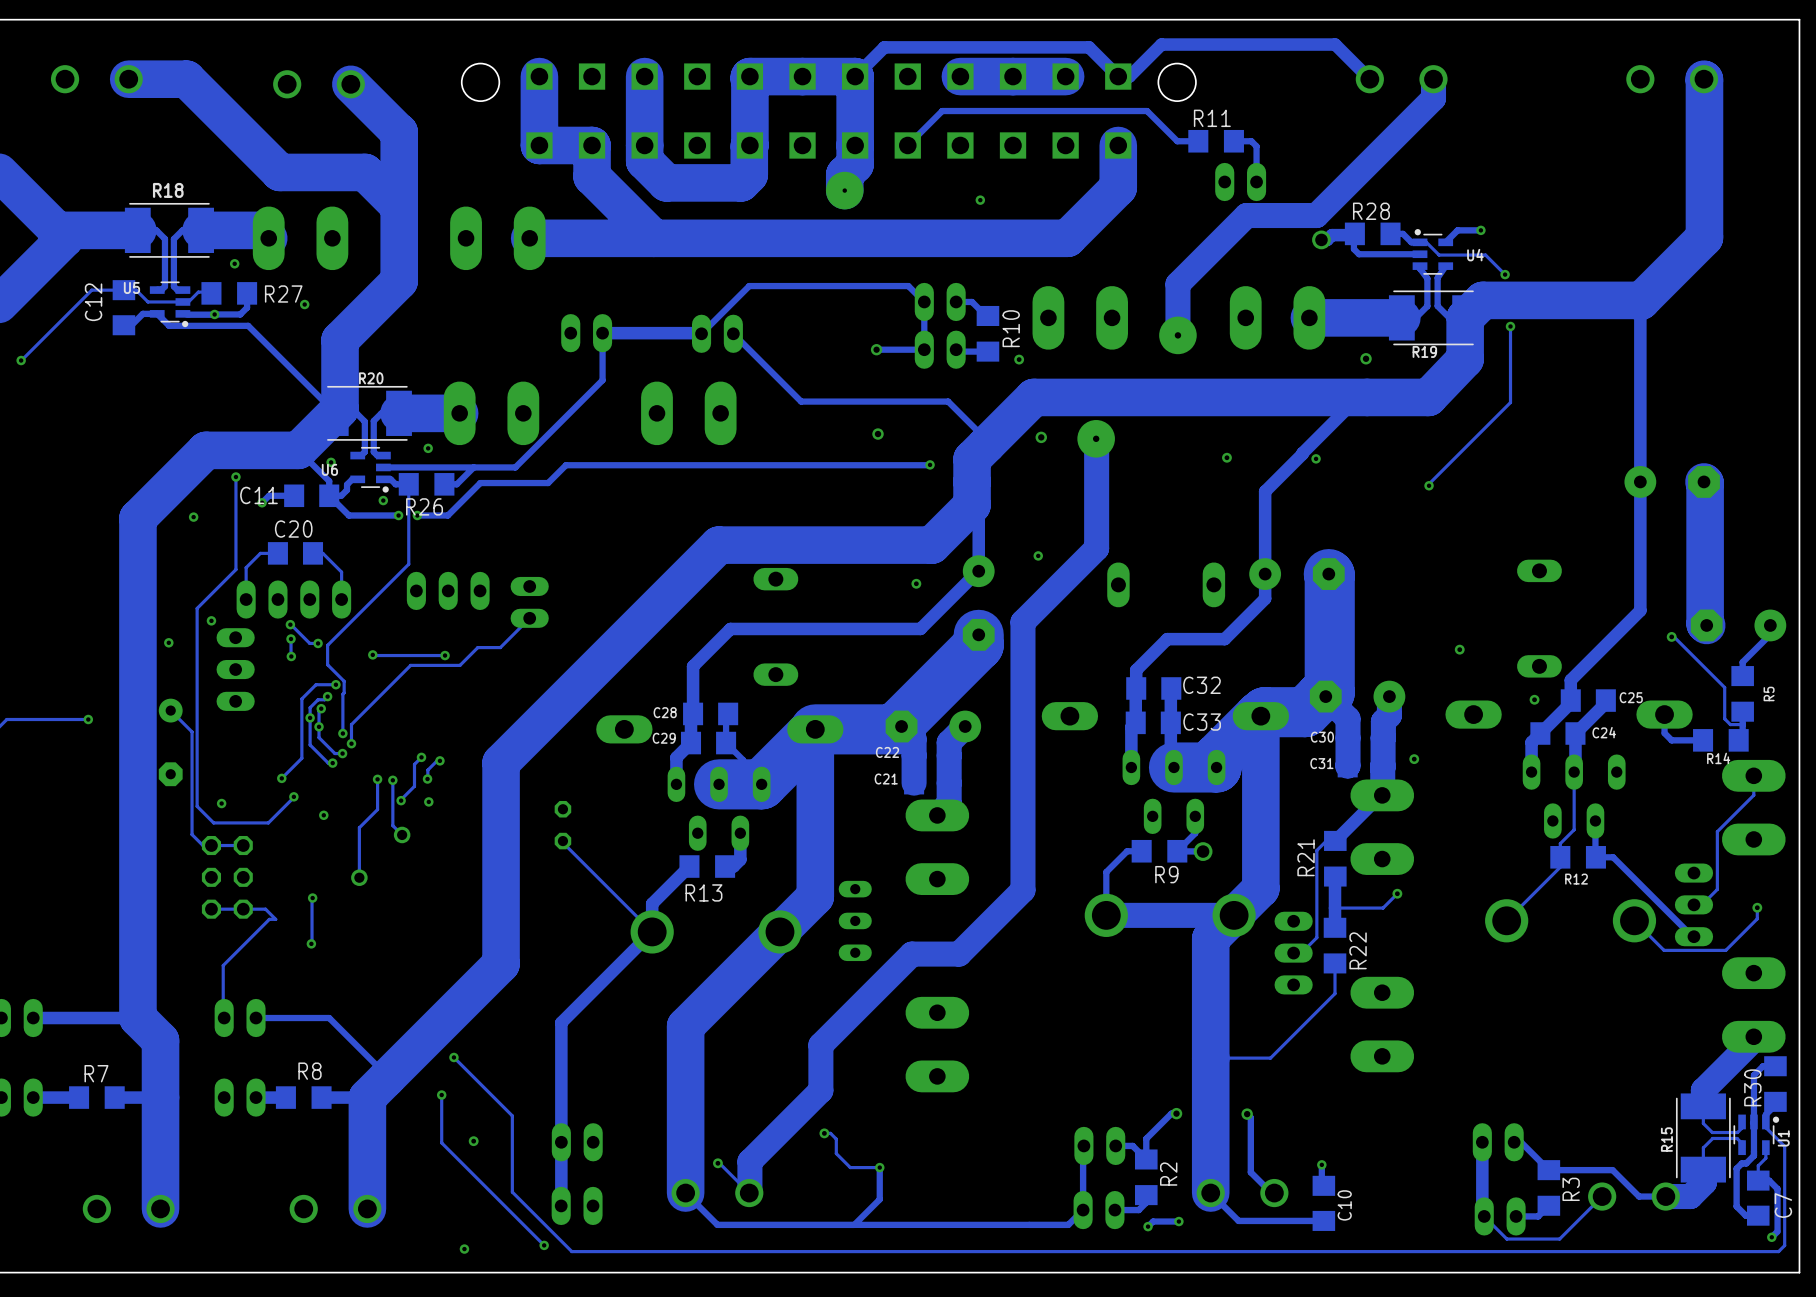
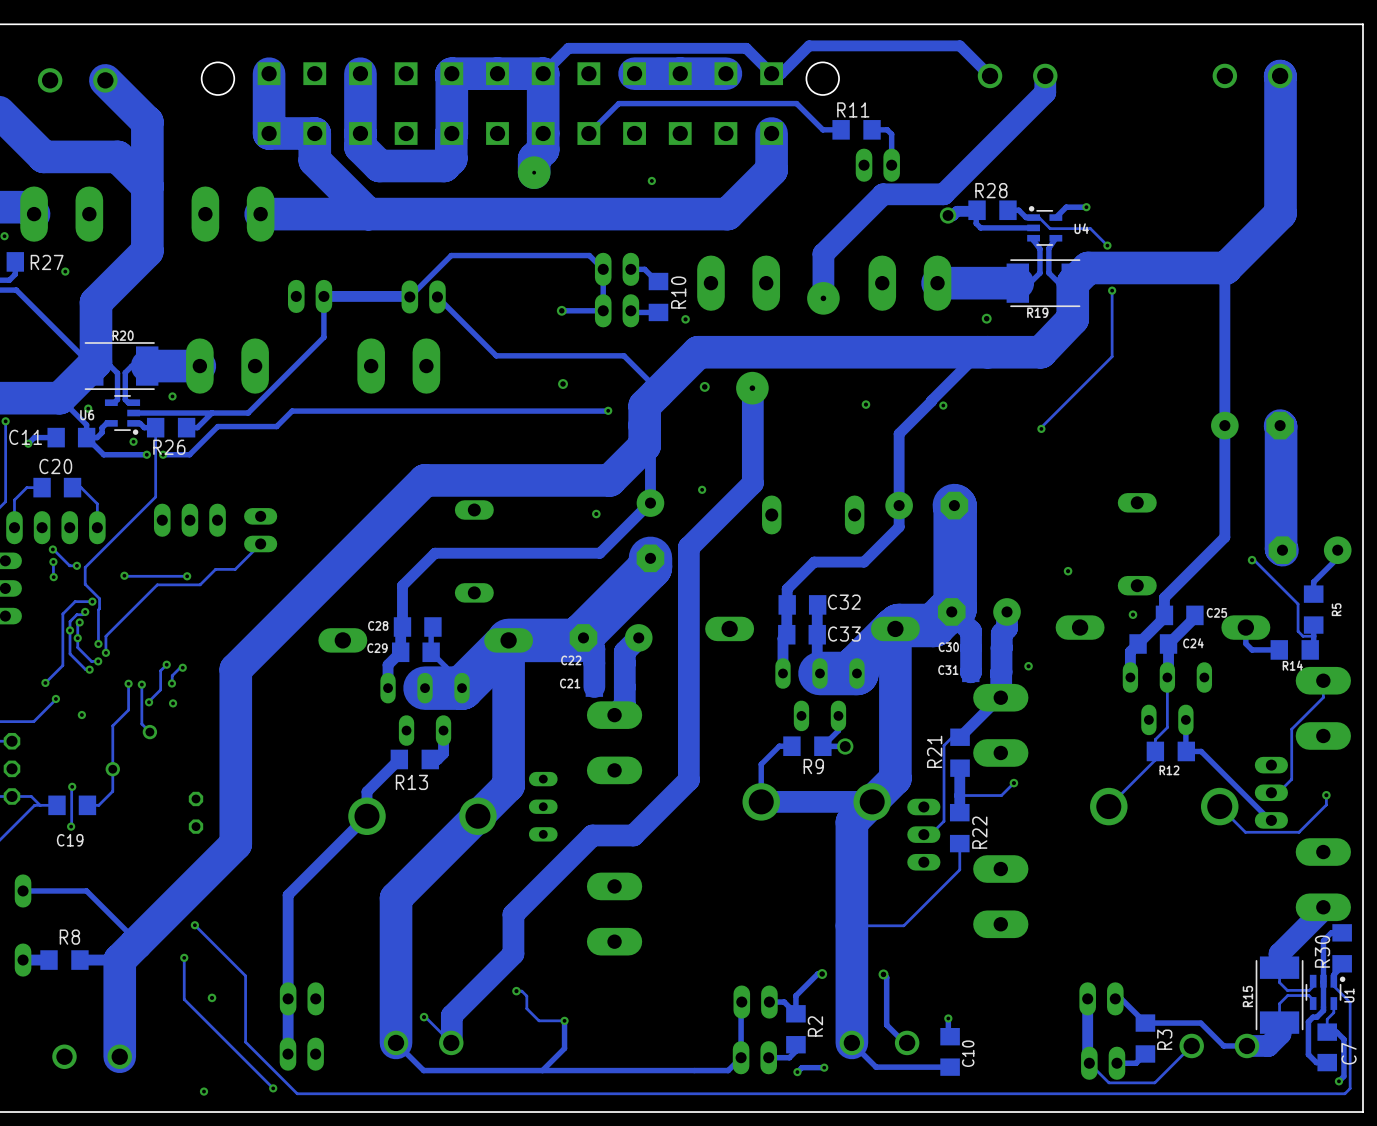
part position: (562, 825) -> (195, 812)
track: (562, 841) (652, 931) -> none
track: none -> (112, 769) (112, 791) (98, 805) (87, 805)
track: none -> (56, 805) (40, 805)
C19: none -> (72, 805)

